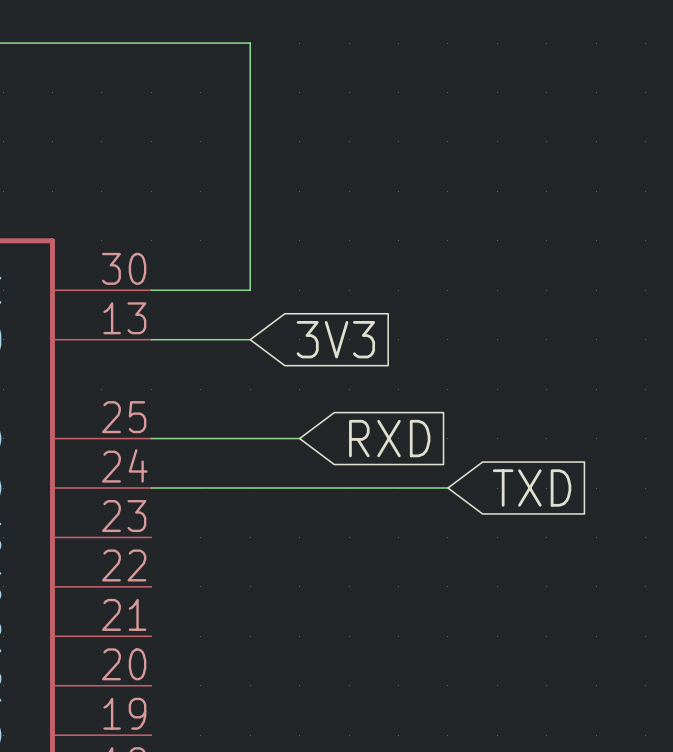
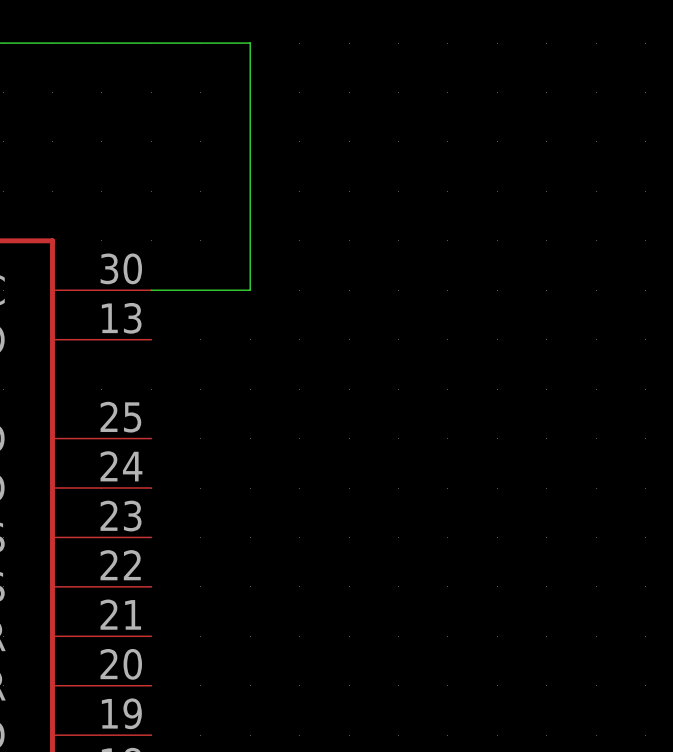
wire: (151, 339) (250, 339) -> none
global label: 3V3 (335, 339) -> none
wire: (151, 438) (299, 438) -> none
global label: RXD (389, 438) -> none
wire: (151, 488) (447, 488) -> none
global label: TXD (532, 488) -> none

